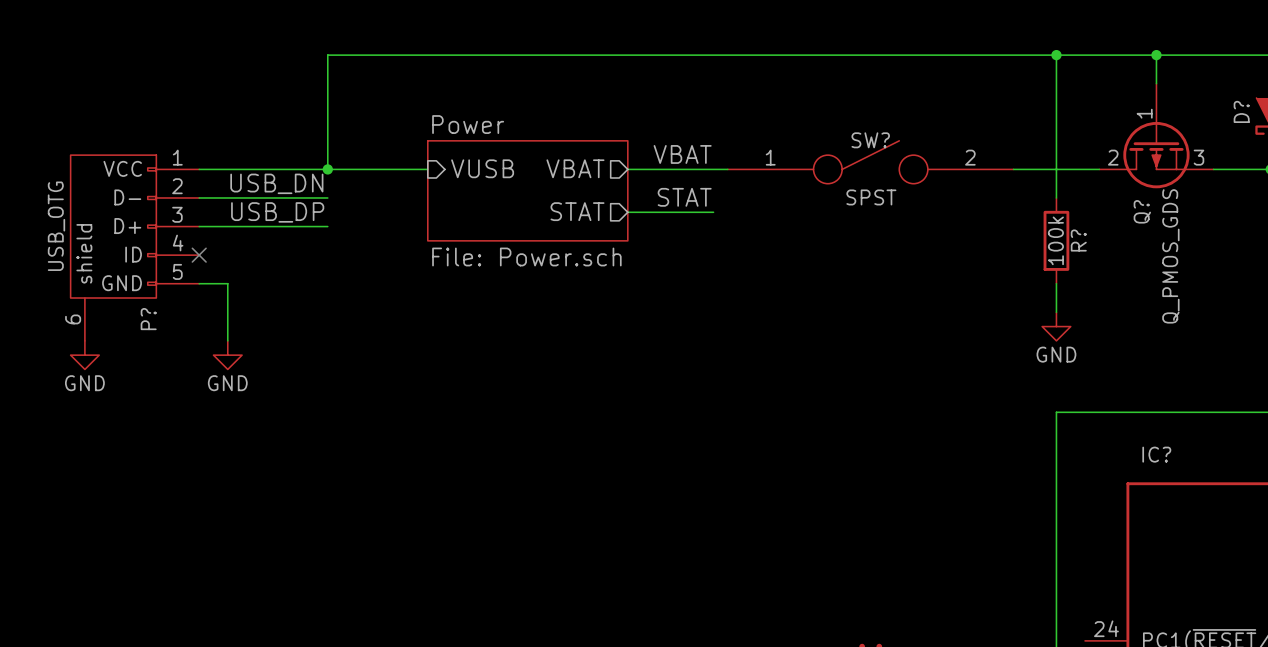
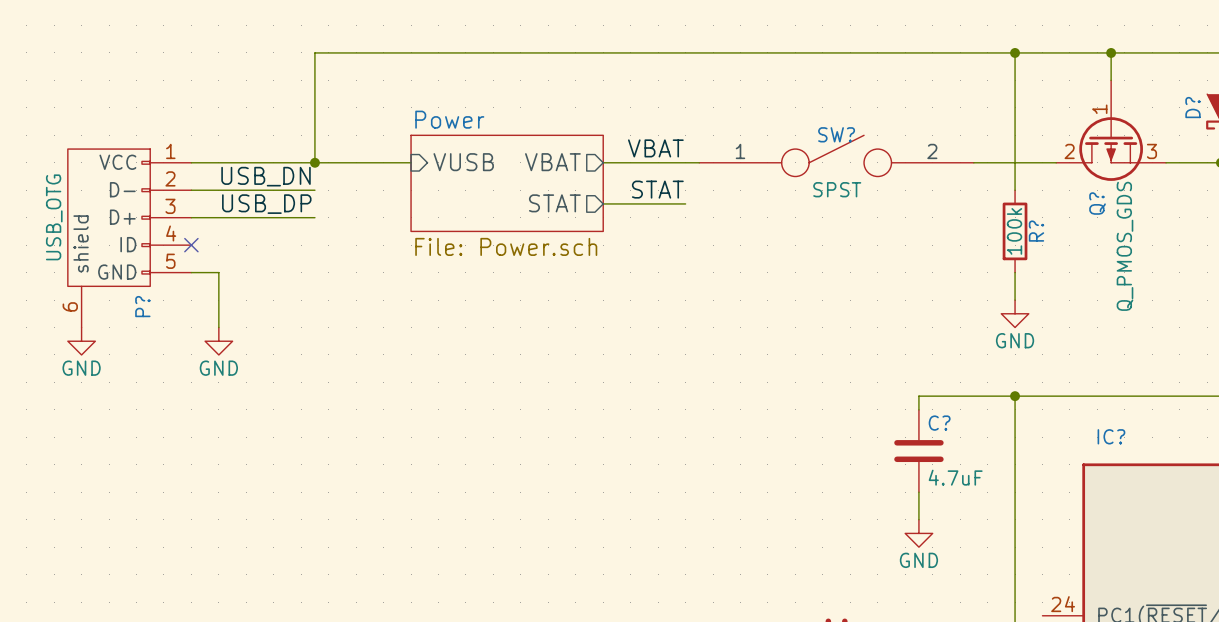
wire: none -> (1015, 396) (918, 396) (918, 409)
junction: none -> (1015, 396)
C?: none -> 4.7uF (918, 451)
wire: none -> (918, 492) (918, 519)
power symbol: none -> GND (918, 533)

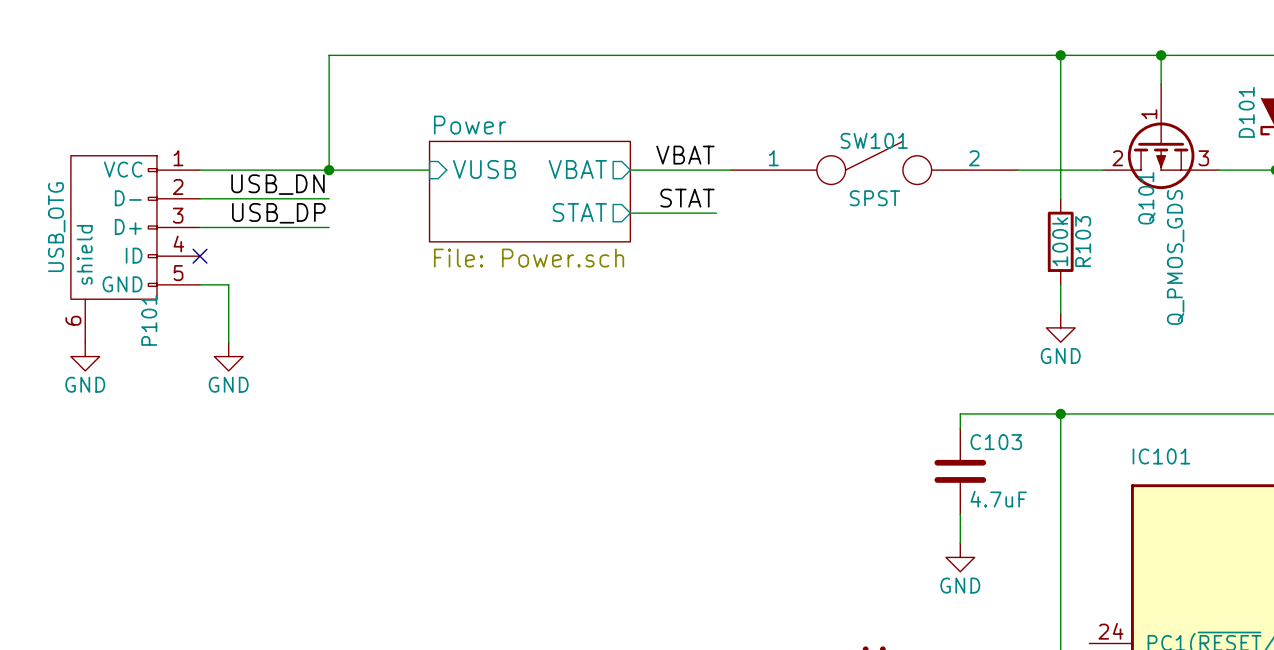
D? name: D? (1192, 107) -> D101 (1246, 112)
SW? name: SW? (836, 134) -> SW101 (874, 140)
Q? name: Q? (1097, 203) -> Q101 (1146, 198)
R? name: R? (1036, 231) -> R103 (1083, 241)
P? name: P? (142, 306) -> P101 (149, 320)
C? name: C? (939, 423) -> C103 (996, 442)
IC? name: IC? (1111, 436) -> IC101 (1161, 456)

